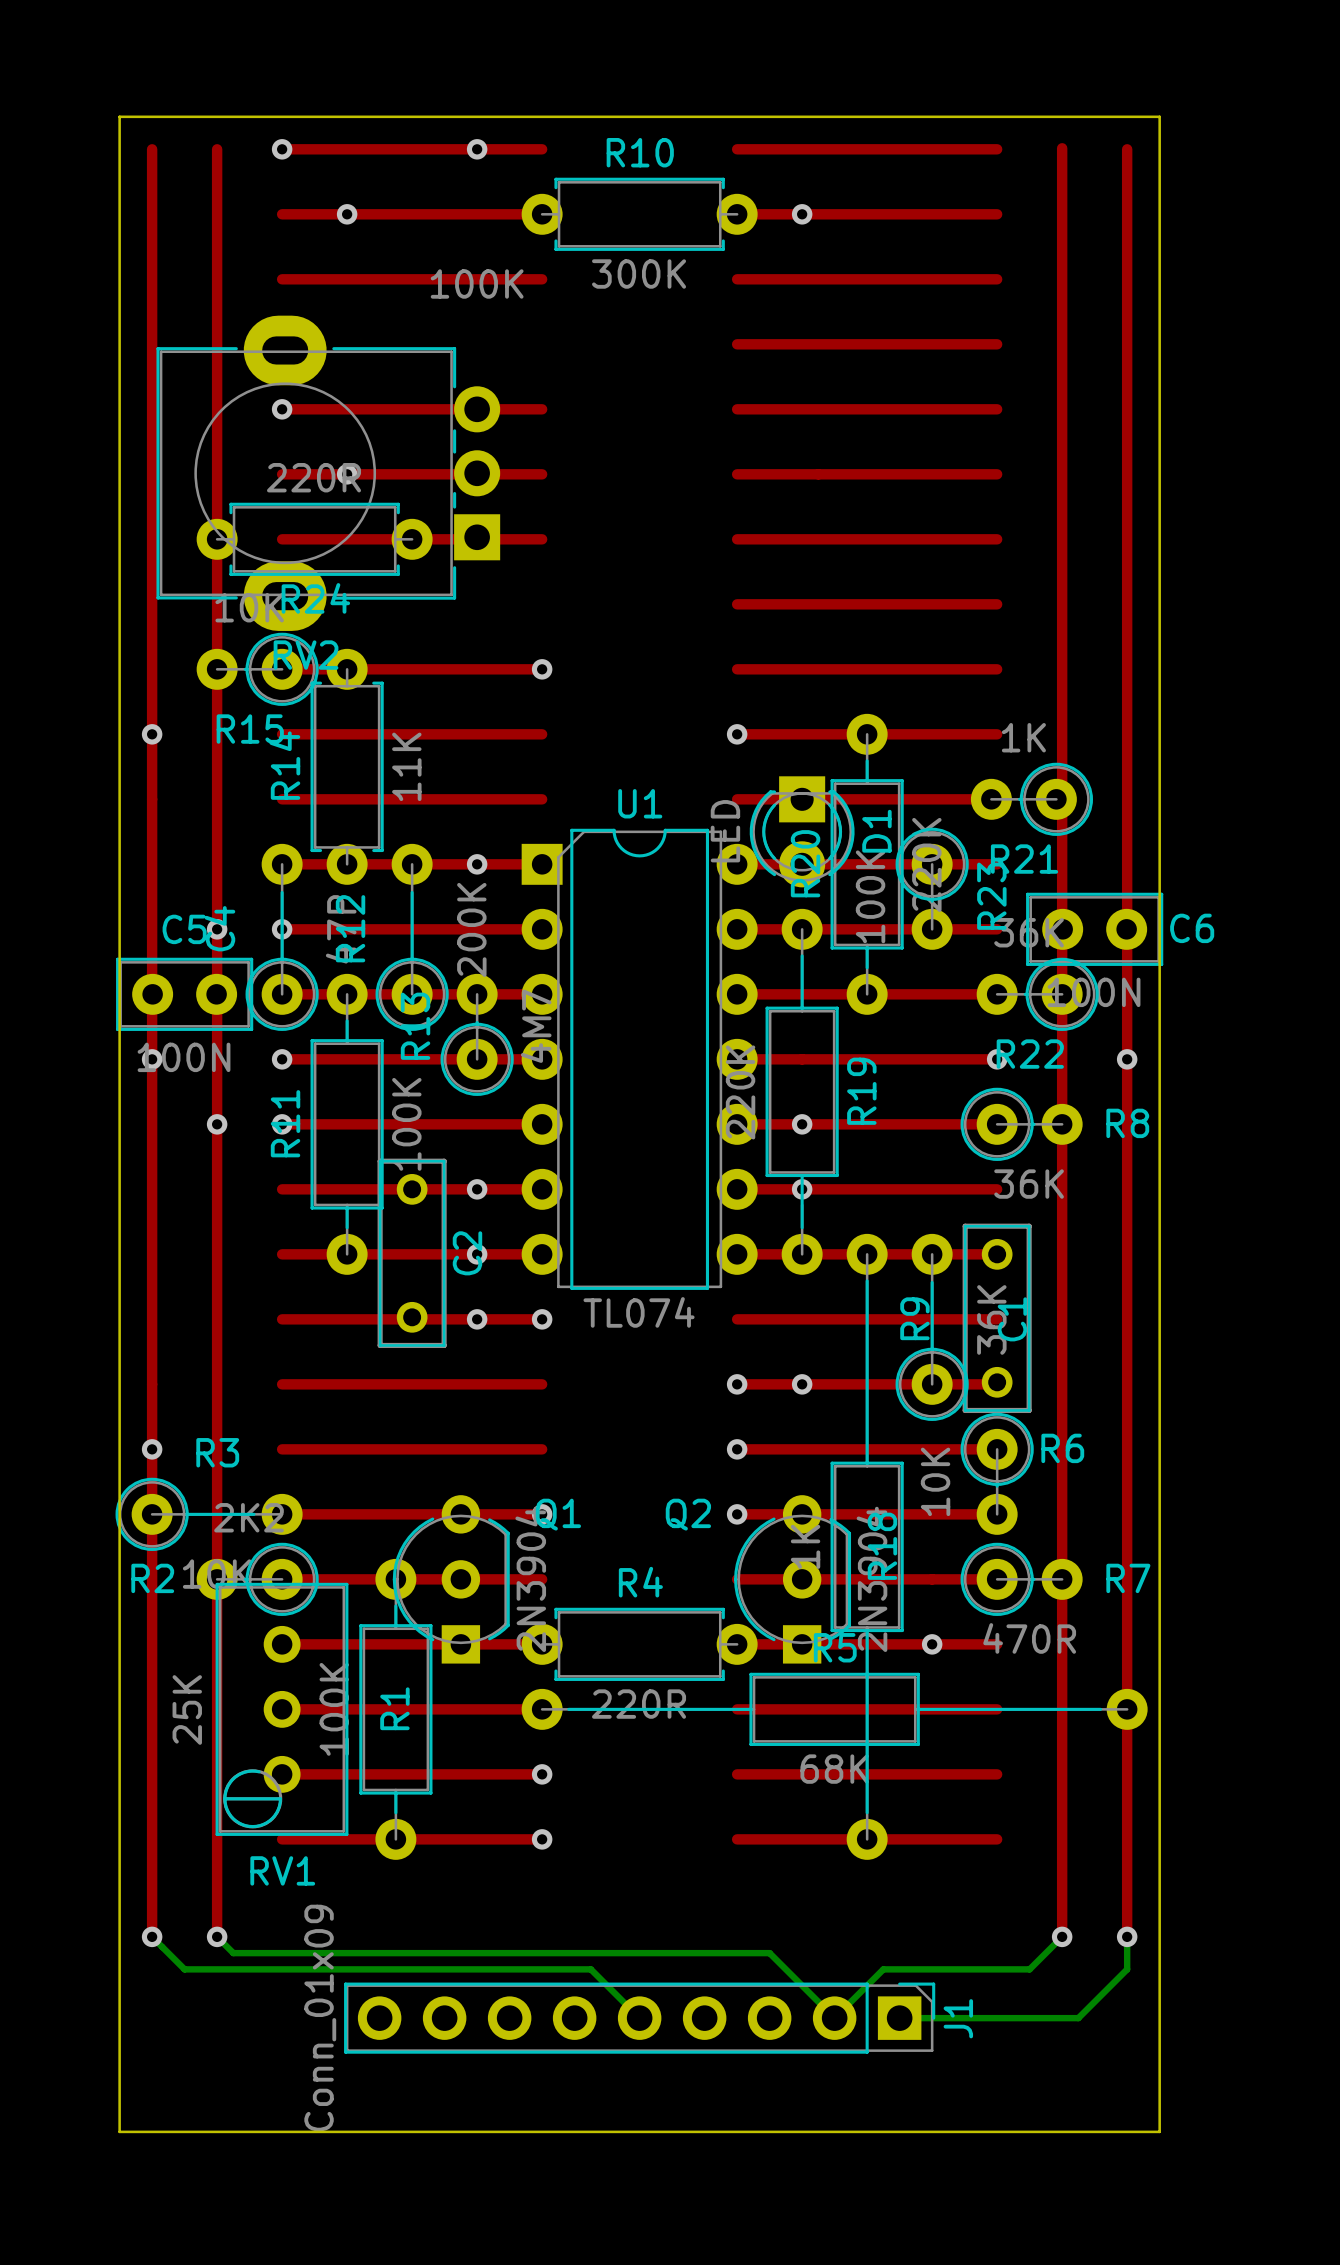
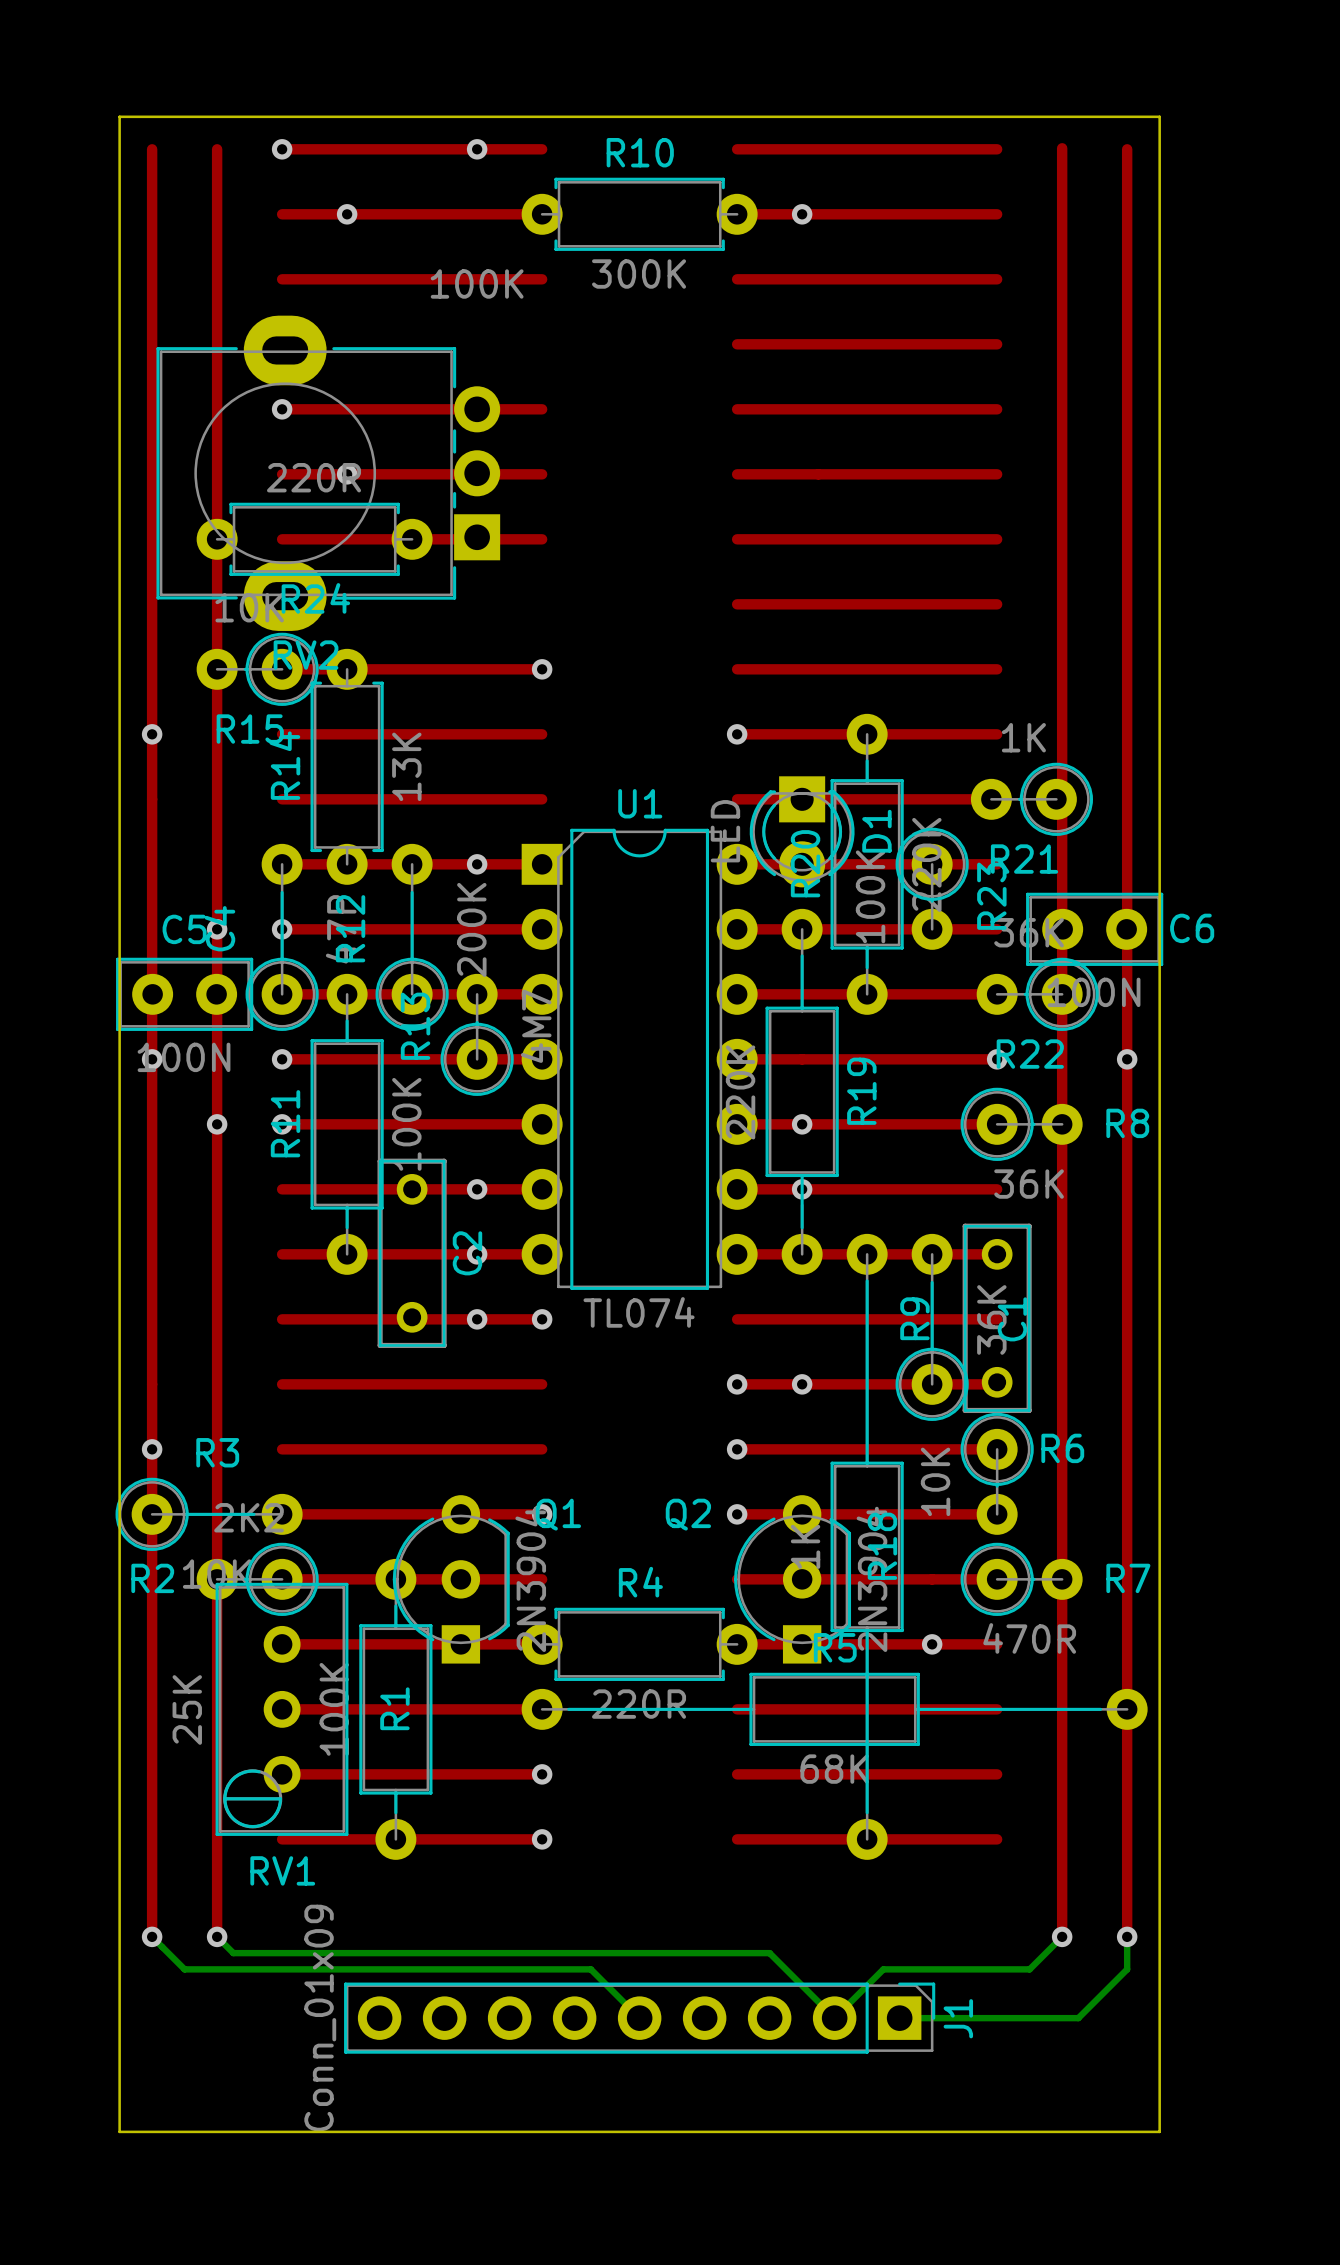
R14 value: 11K (406, 766) -> 13K (406, 766)

